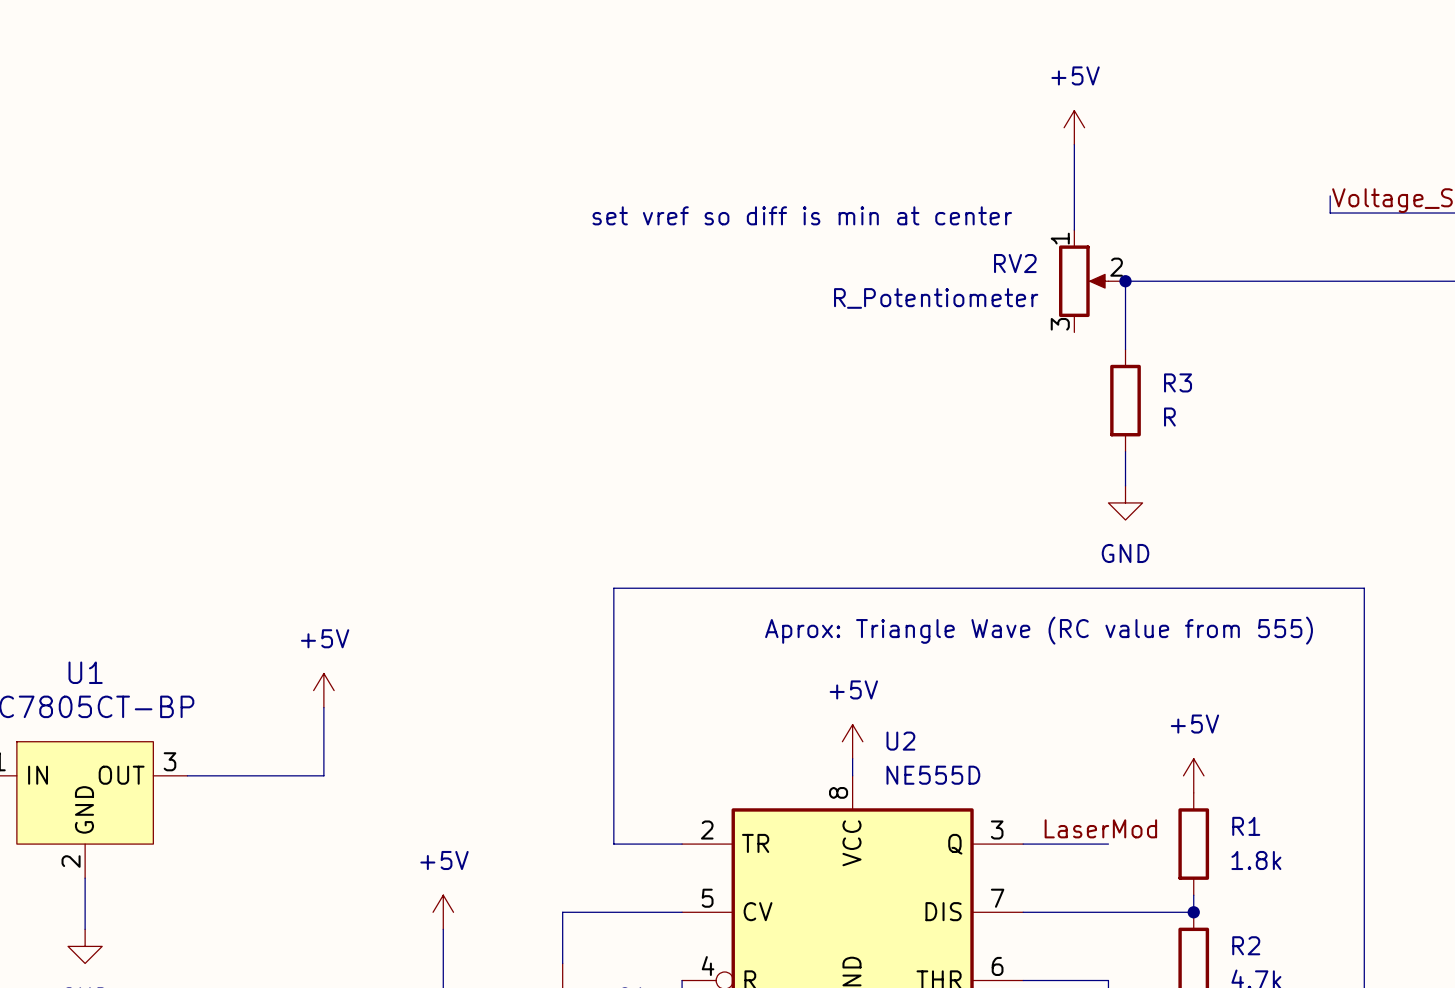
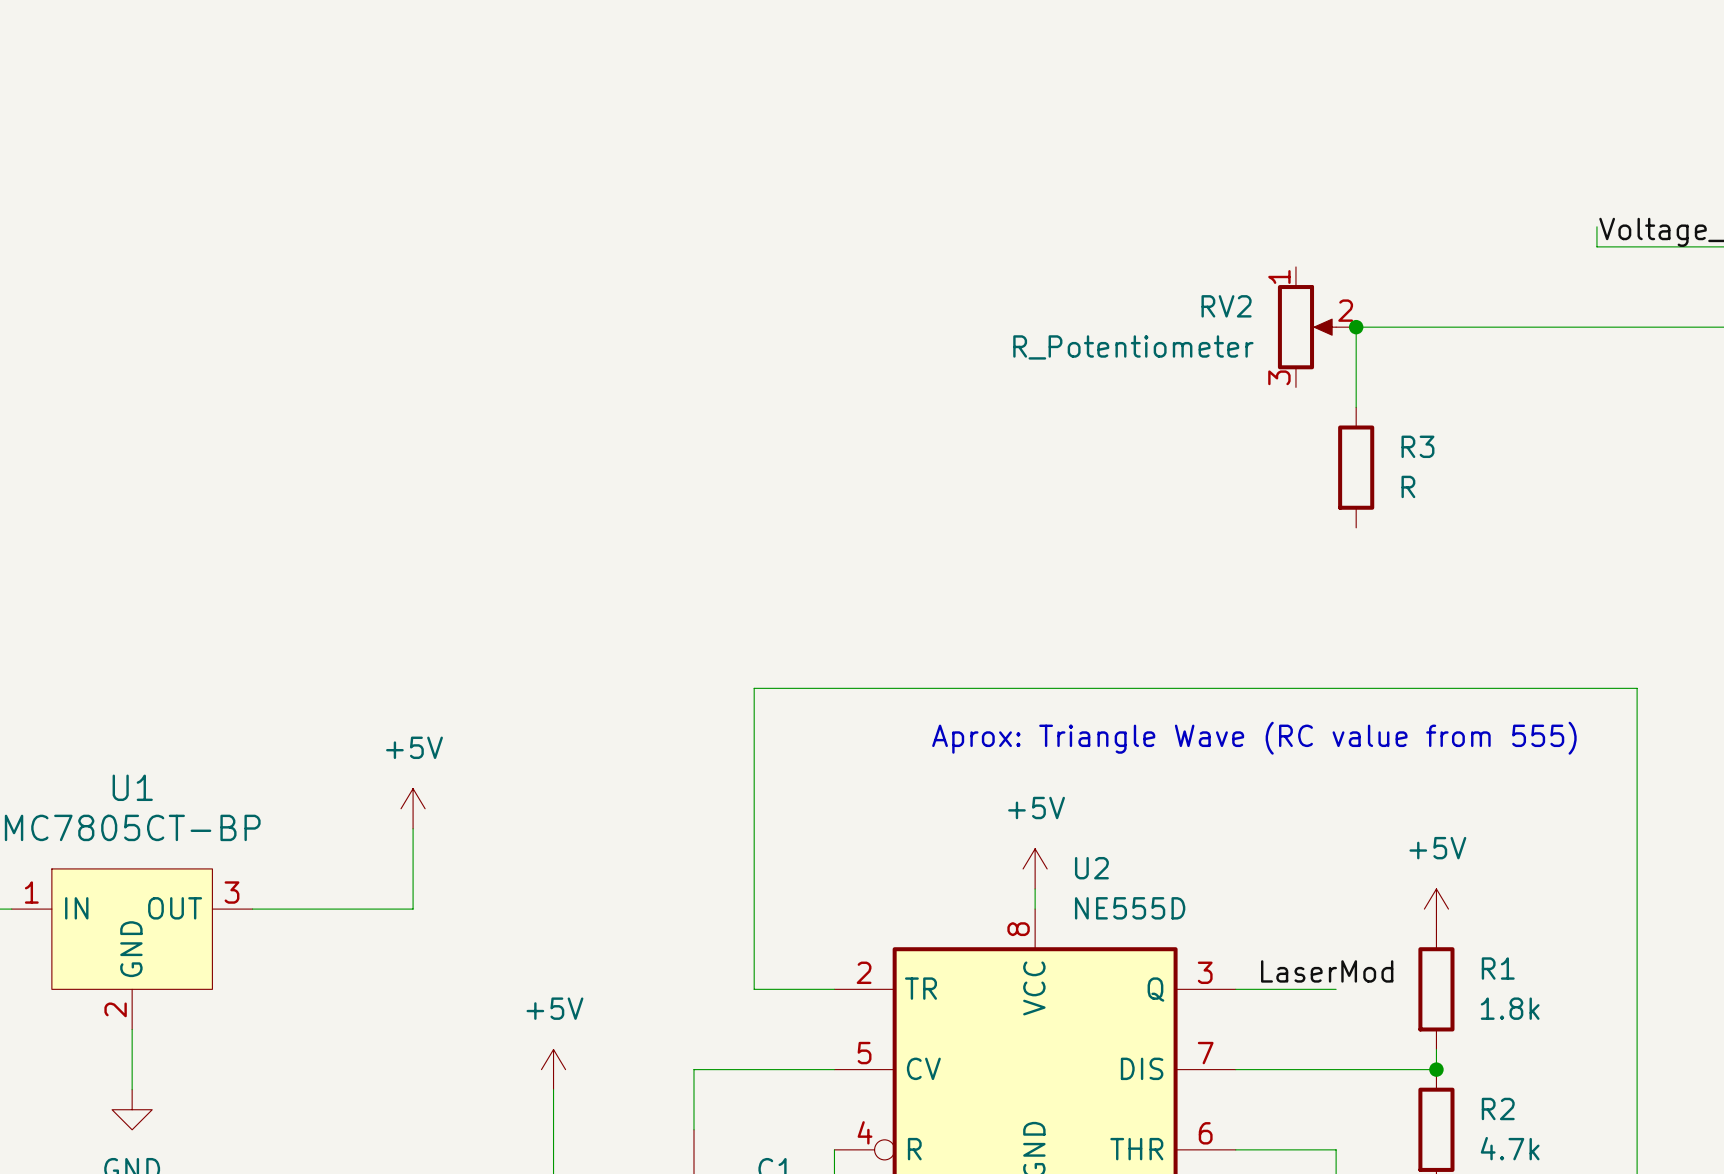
power symbol: +5V (1074, 127) -> none
wire: (1074, 144) (1074, 230) -> none
text: set vref so diff is min at center (802, 215) -> none
wire: (1125, 451) (1125, 485) -> none
power symbol: GND (1125, 502) -> none

